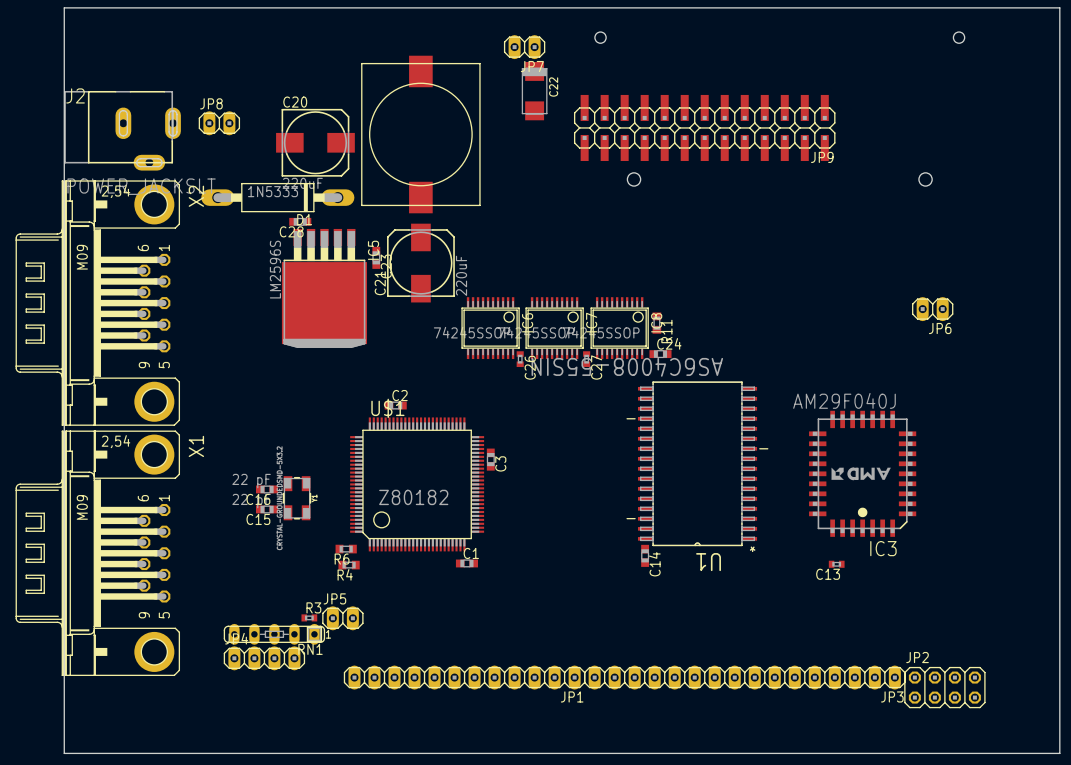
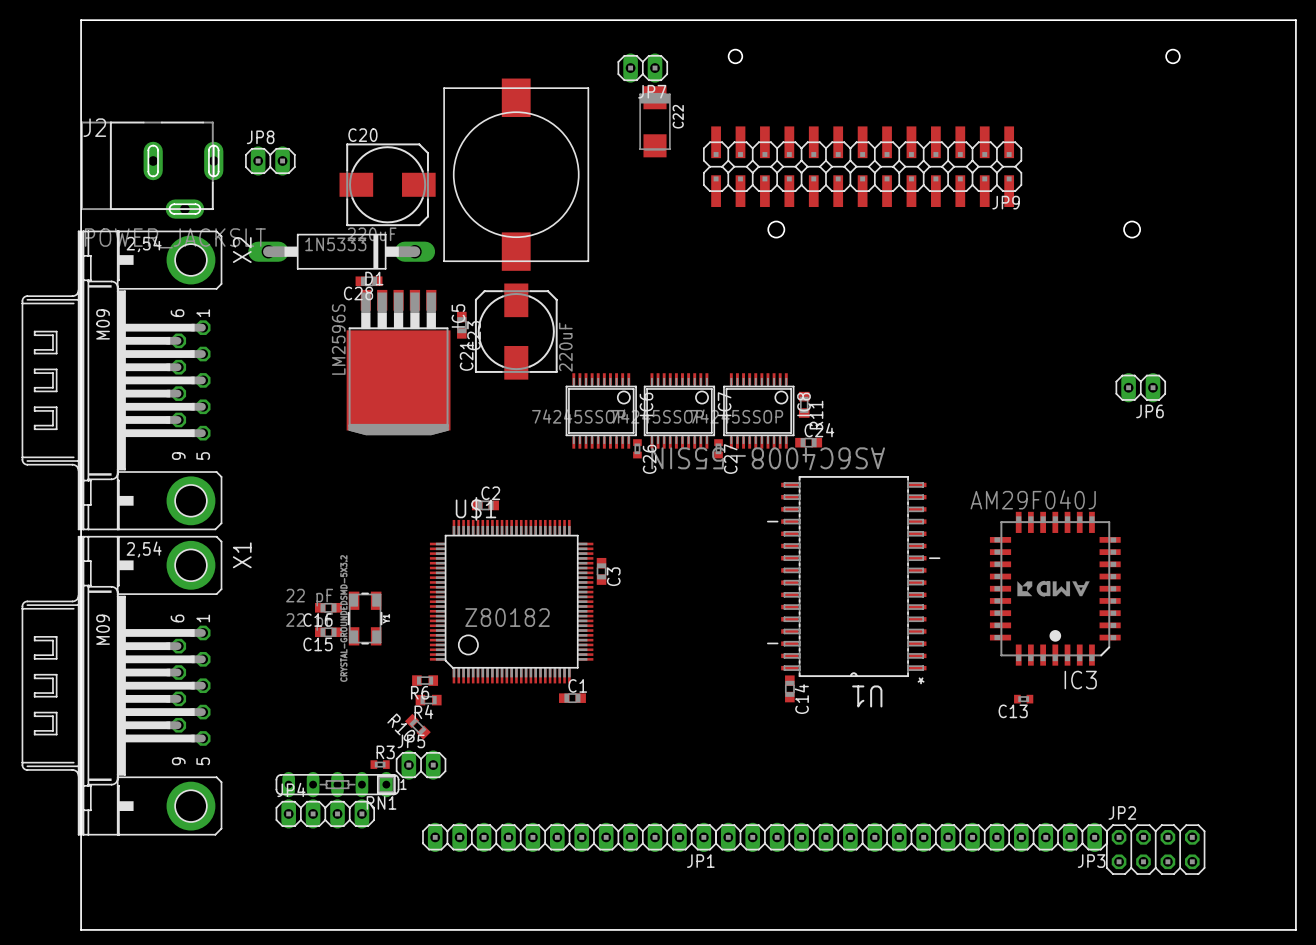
R10: none -> (417, 726)

